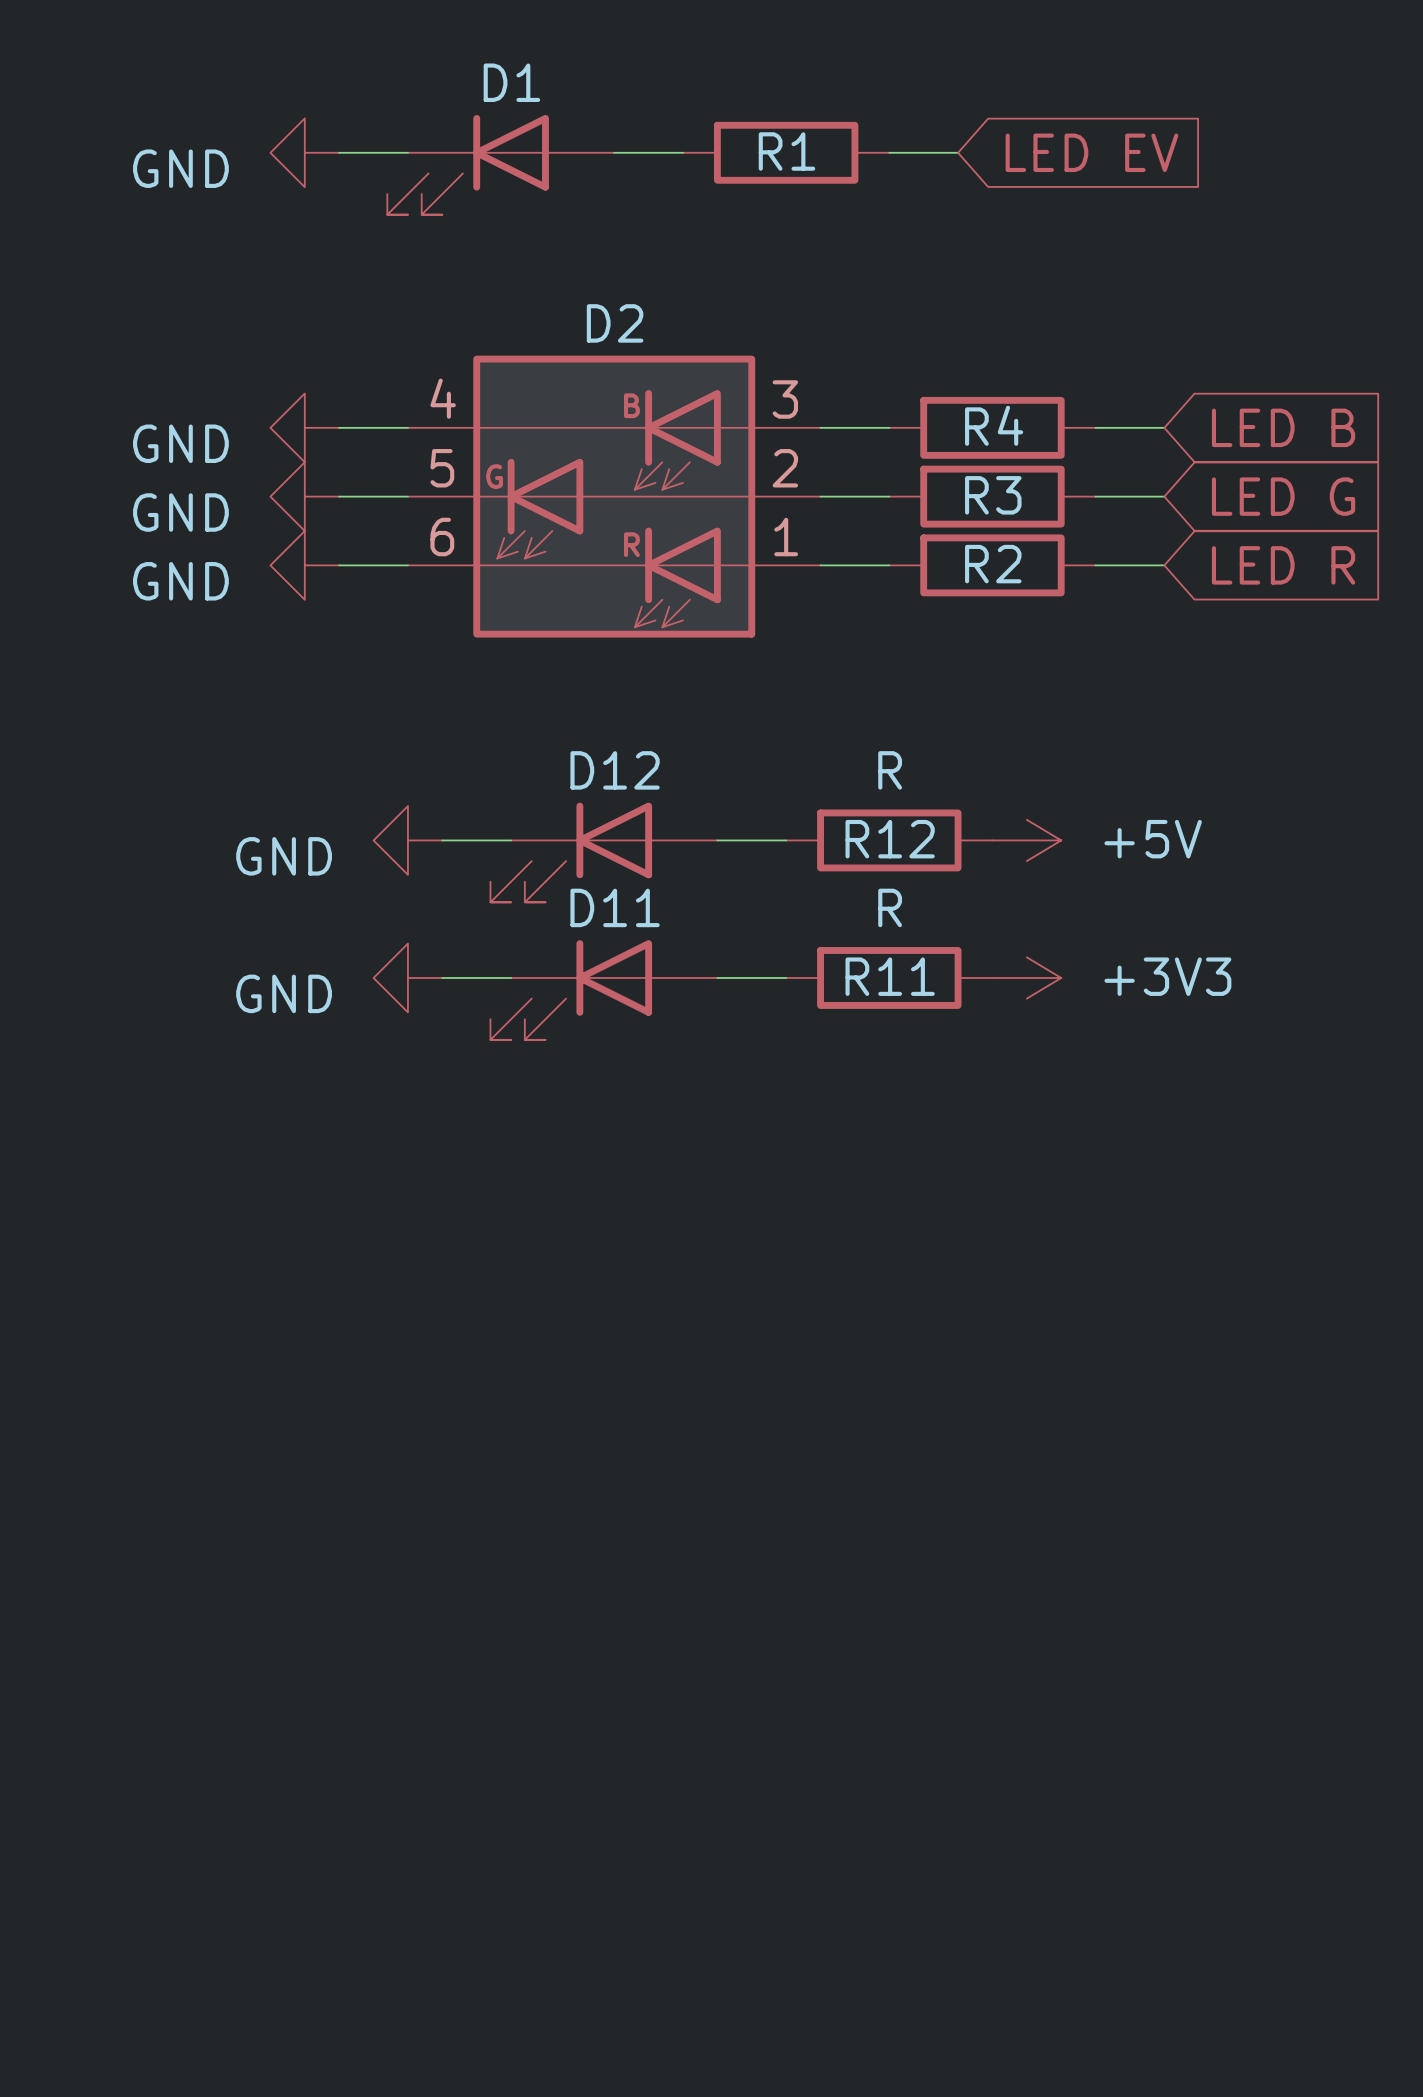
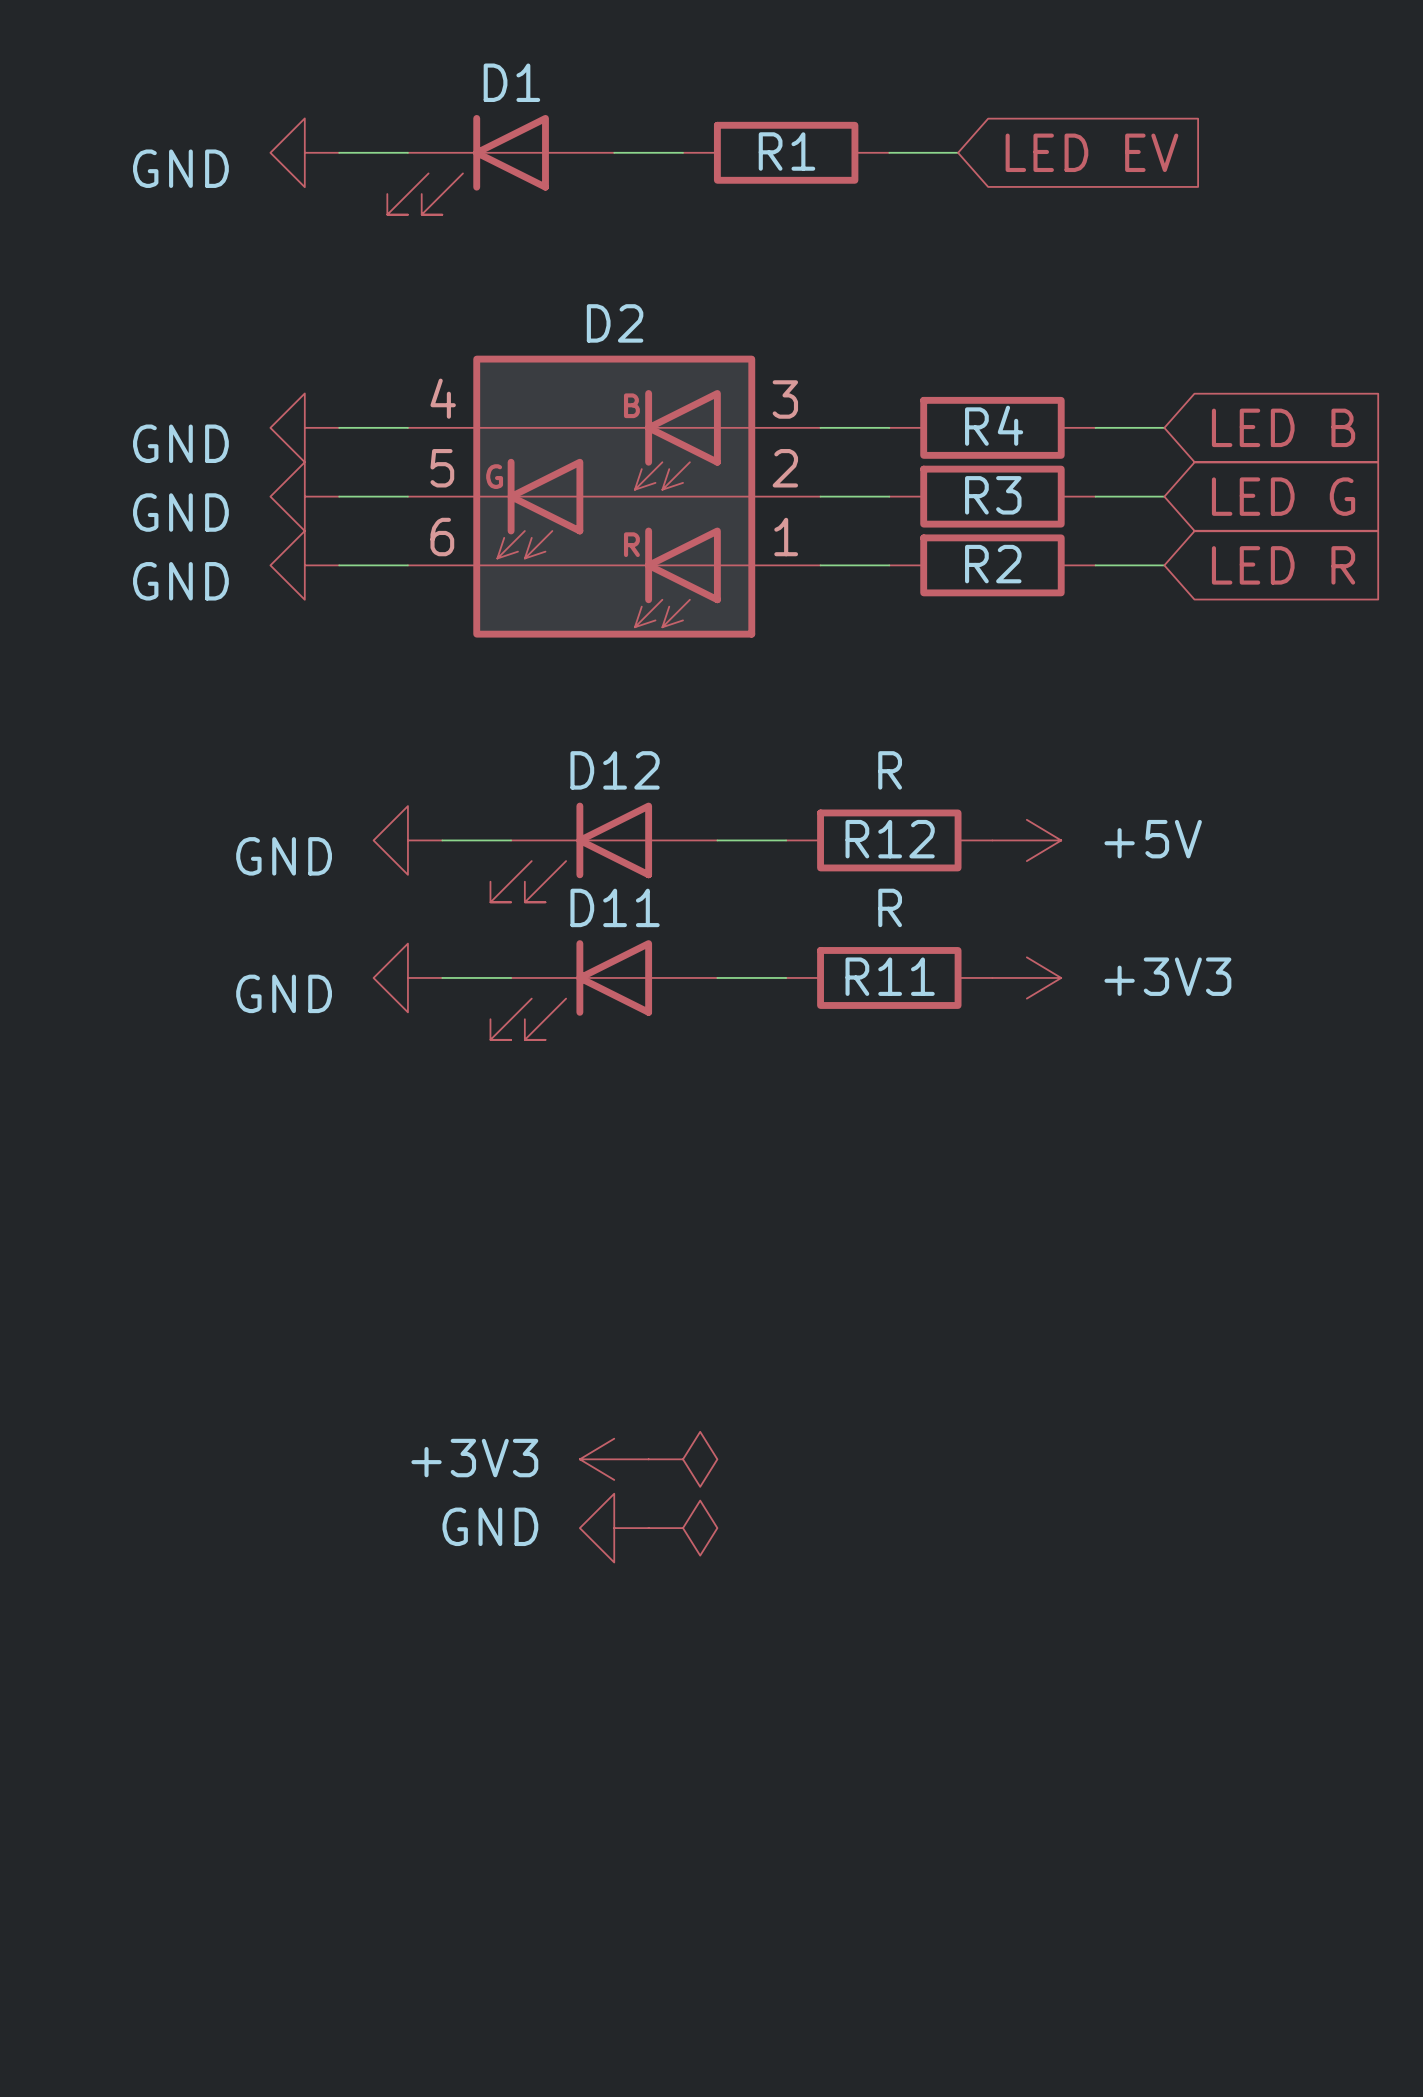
power symbol: none -> +3V3 (614, 1459)
power symbol: none -> (683, 1459)
power symbol: none -> GND (614, 1528)
power symbol: none -> (683, 1528)

